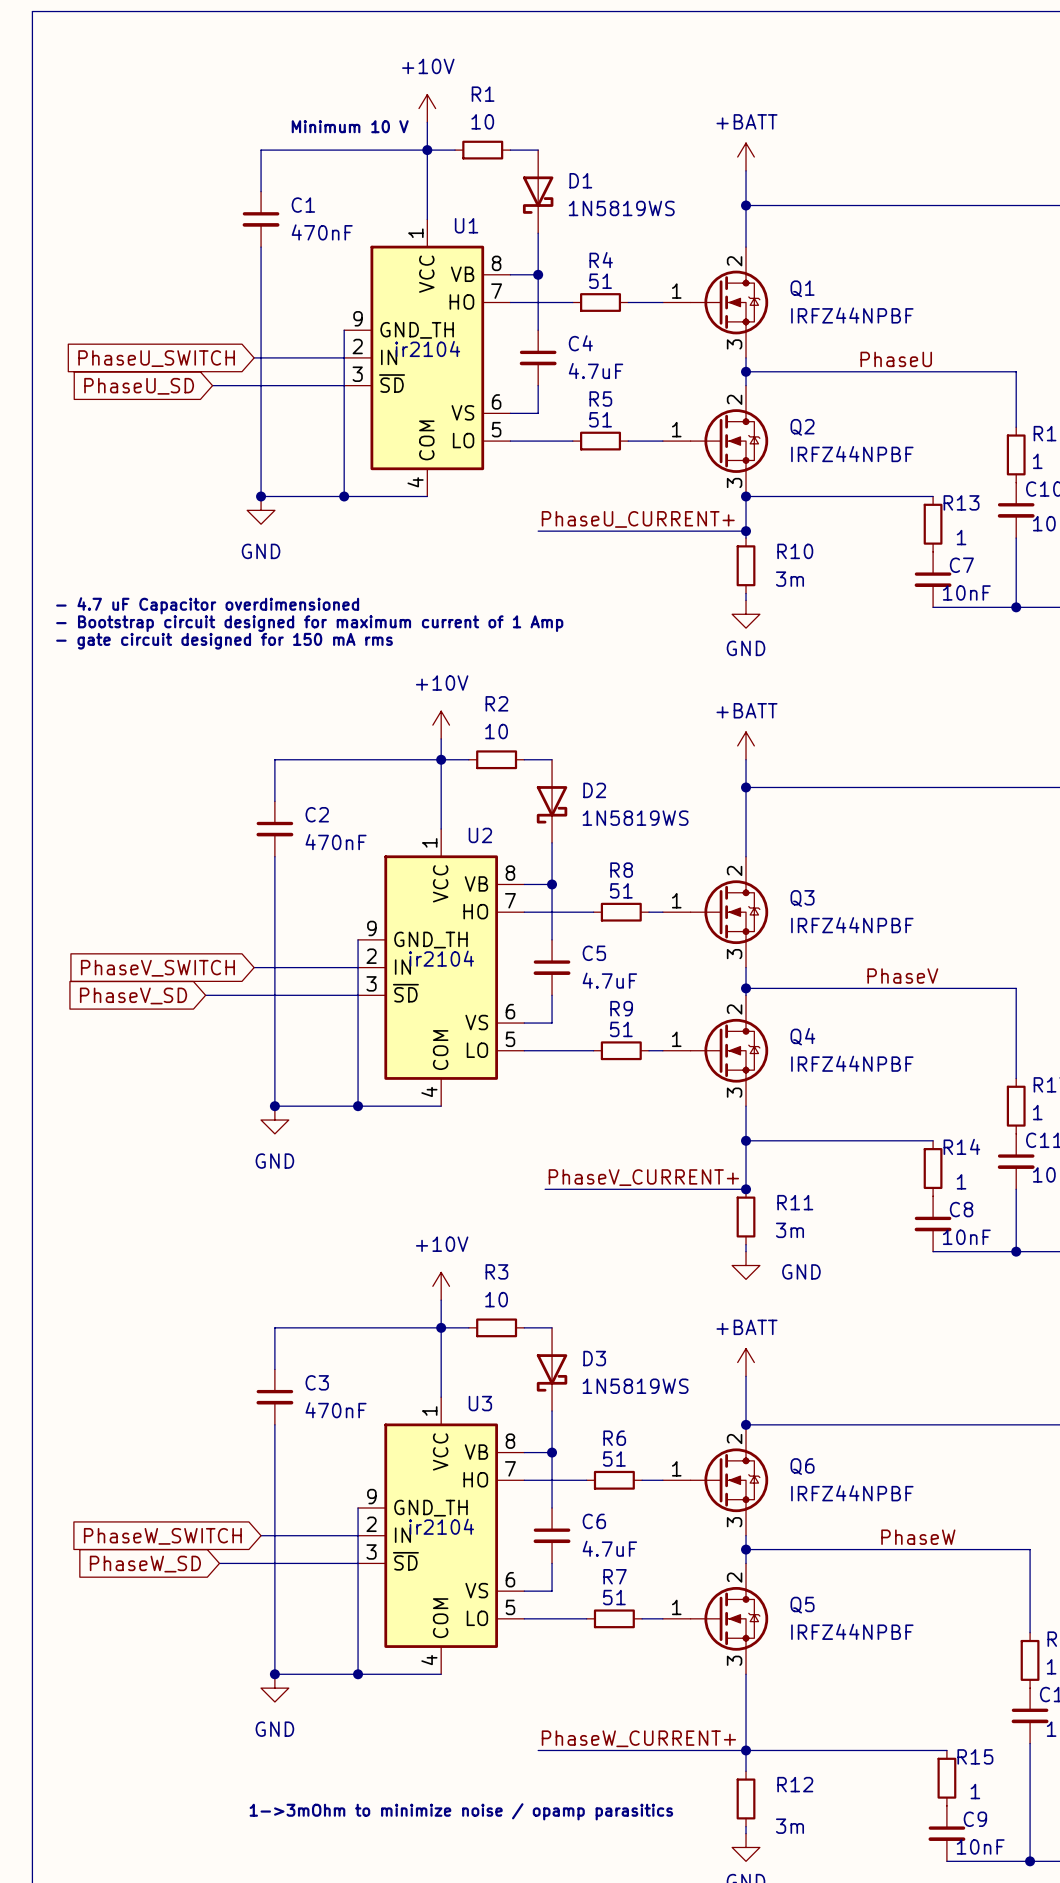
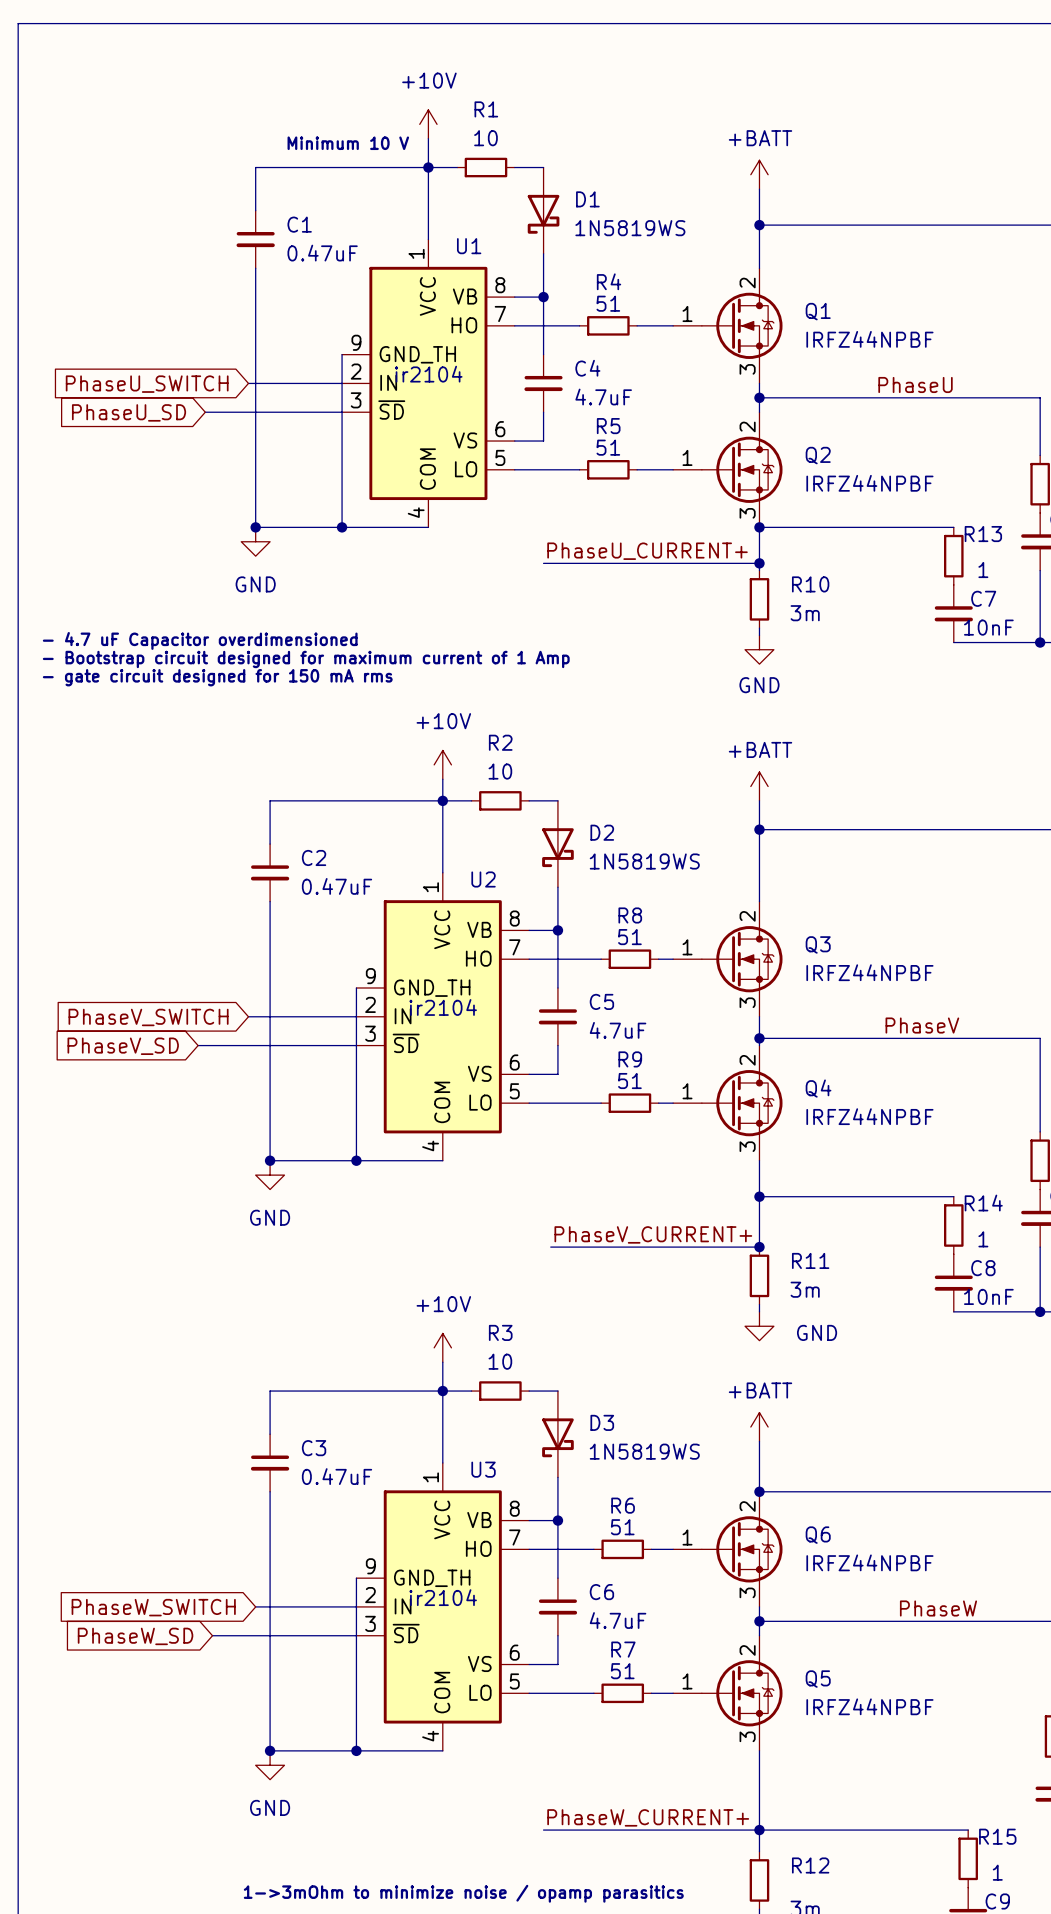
C1 value: 470nF (322, 232) -> 0.47uF (322, 253)
C2 value: 470nF (336, 842) -> 0.47uF (337, 886)
C3 value: 470nF (336, 1410) -> 0.47uF (337, 1476)

